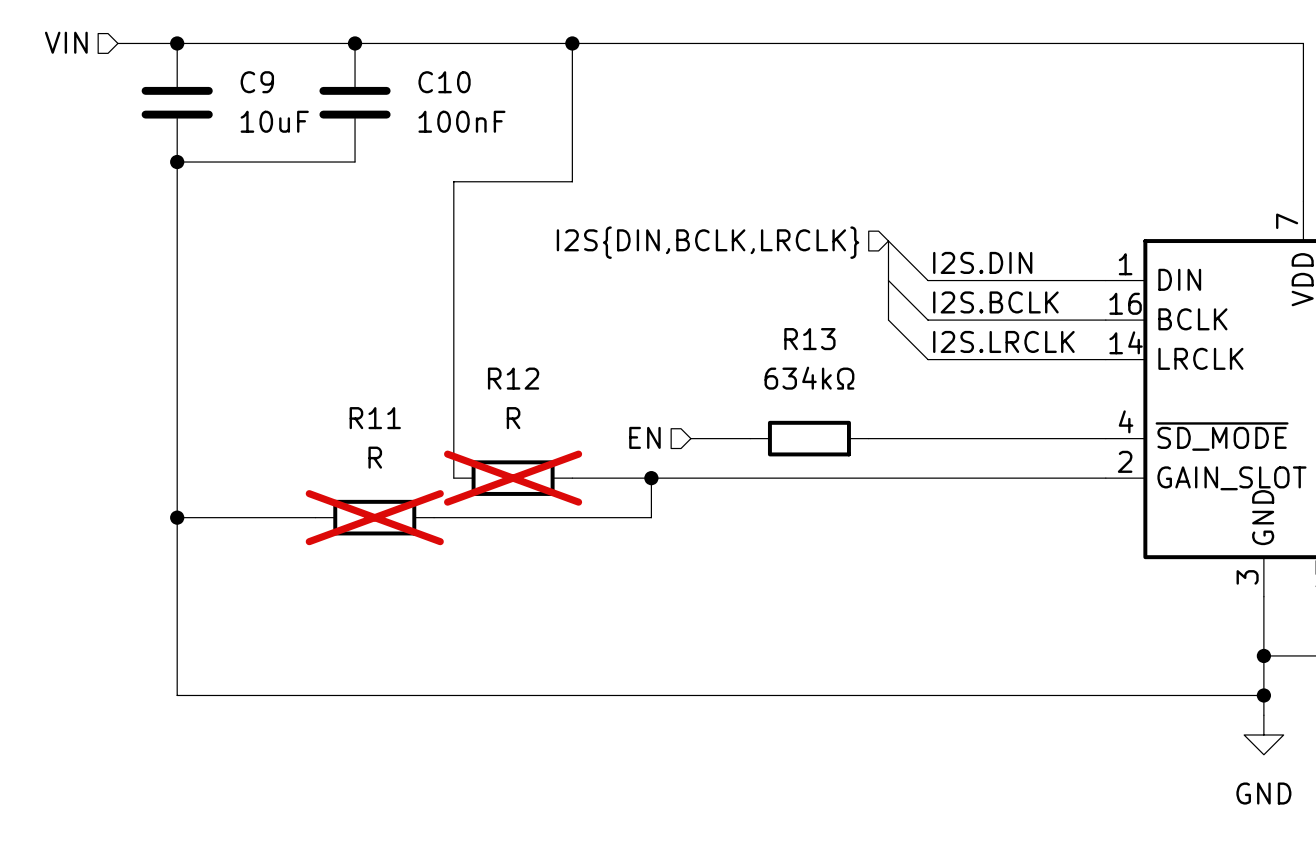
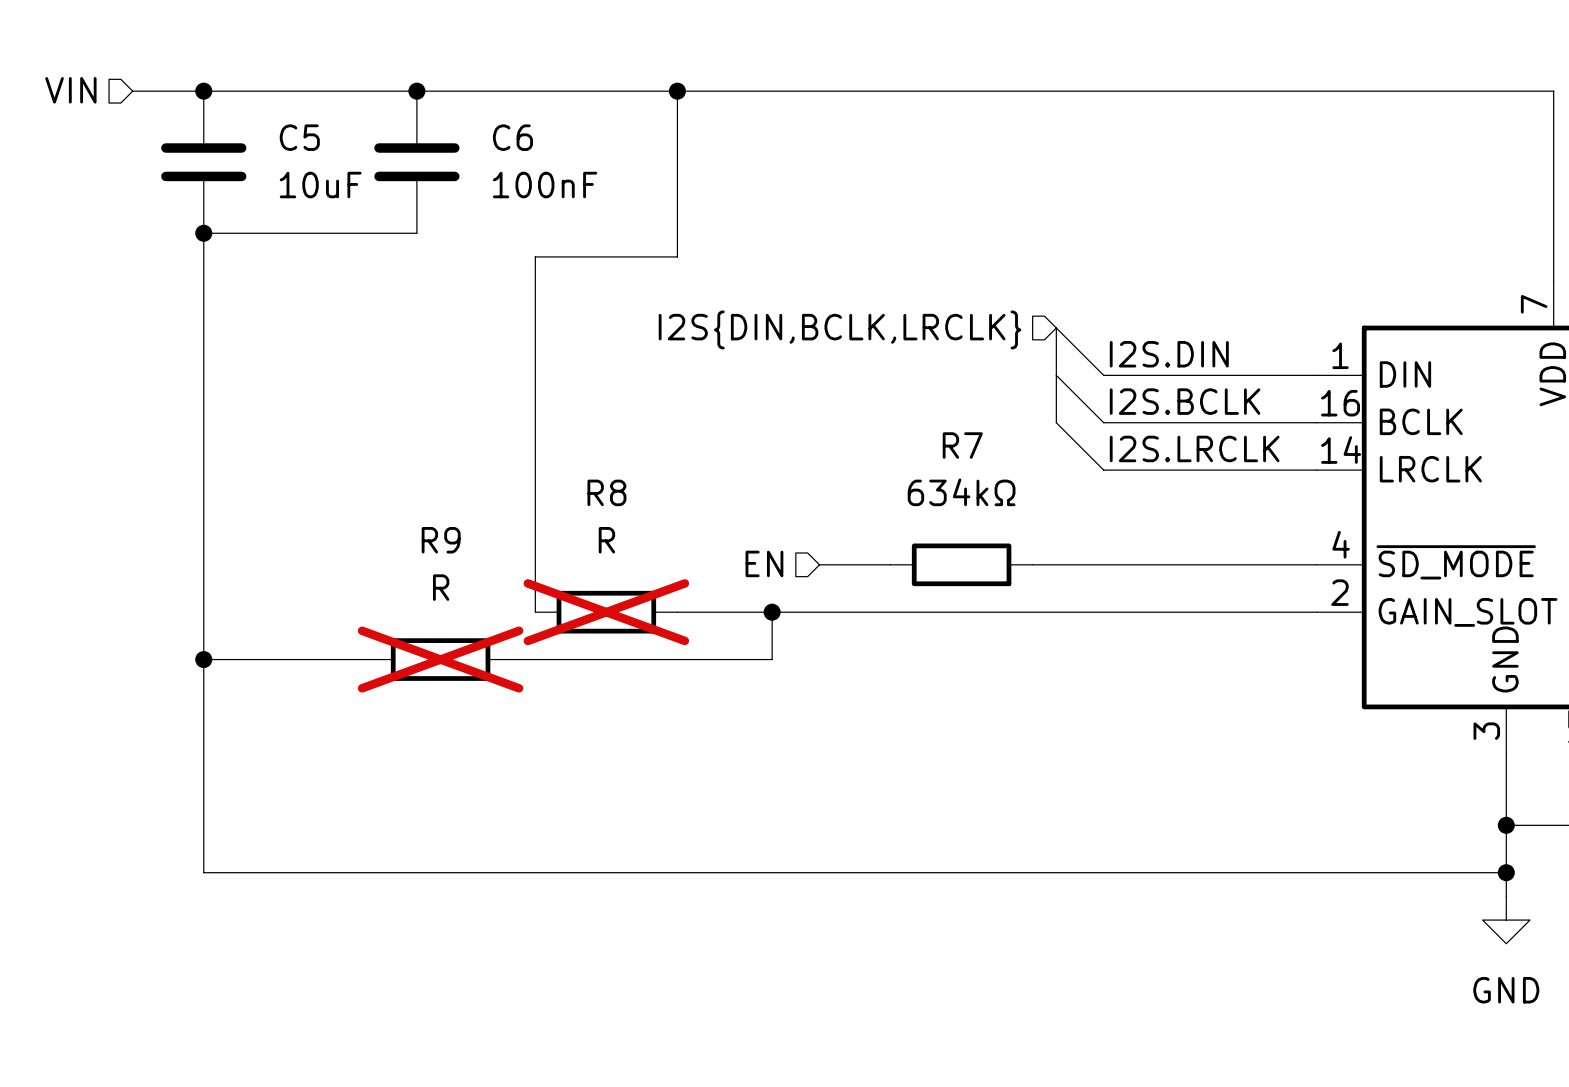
C9 name: C9 (257, 82) -> C5 (299, 137)
C10 name: C10 (444, 82) -> C6 (512, 137)
R13 name: R13 (809, 339) -> R7 (962, 445)
R12 name: R12 (513, 378) -> R8 (606, 492)
R11 name: R11 (375, 418) -> R9 (441, 540)

